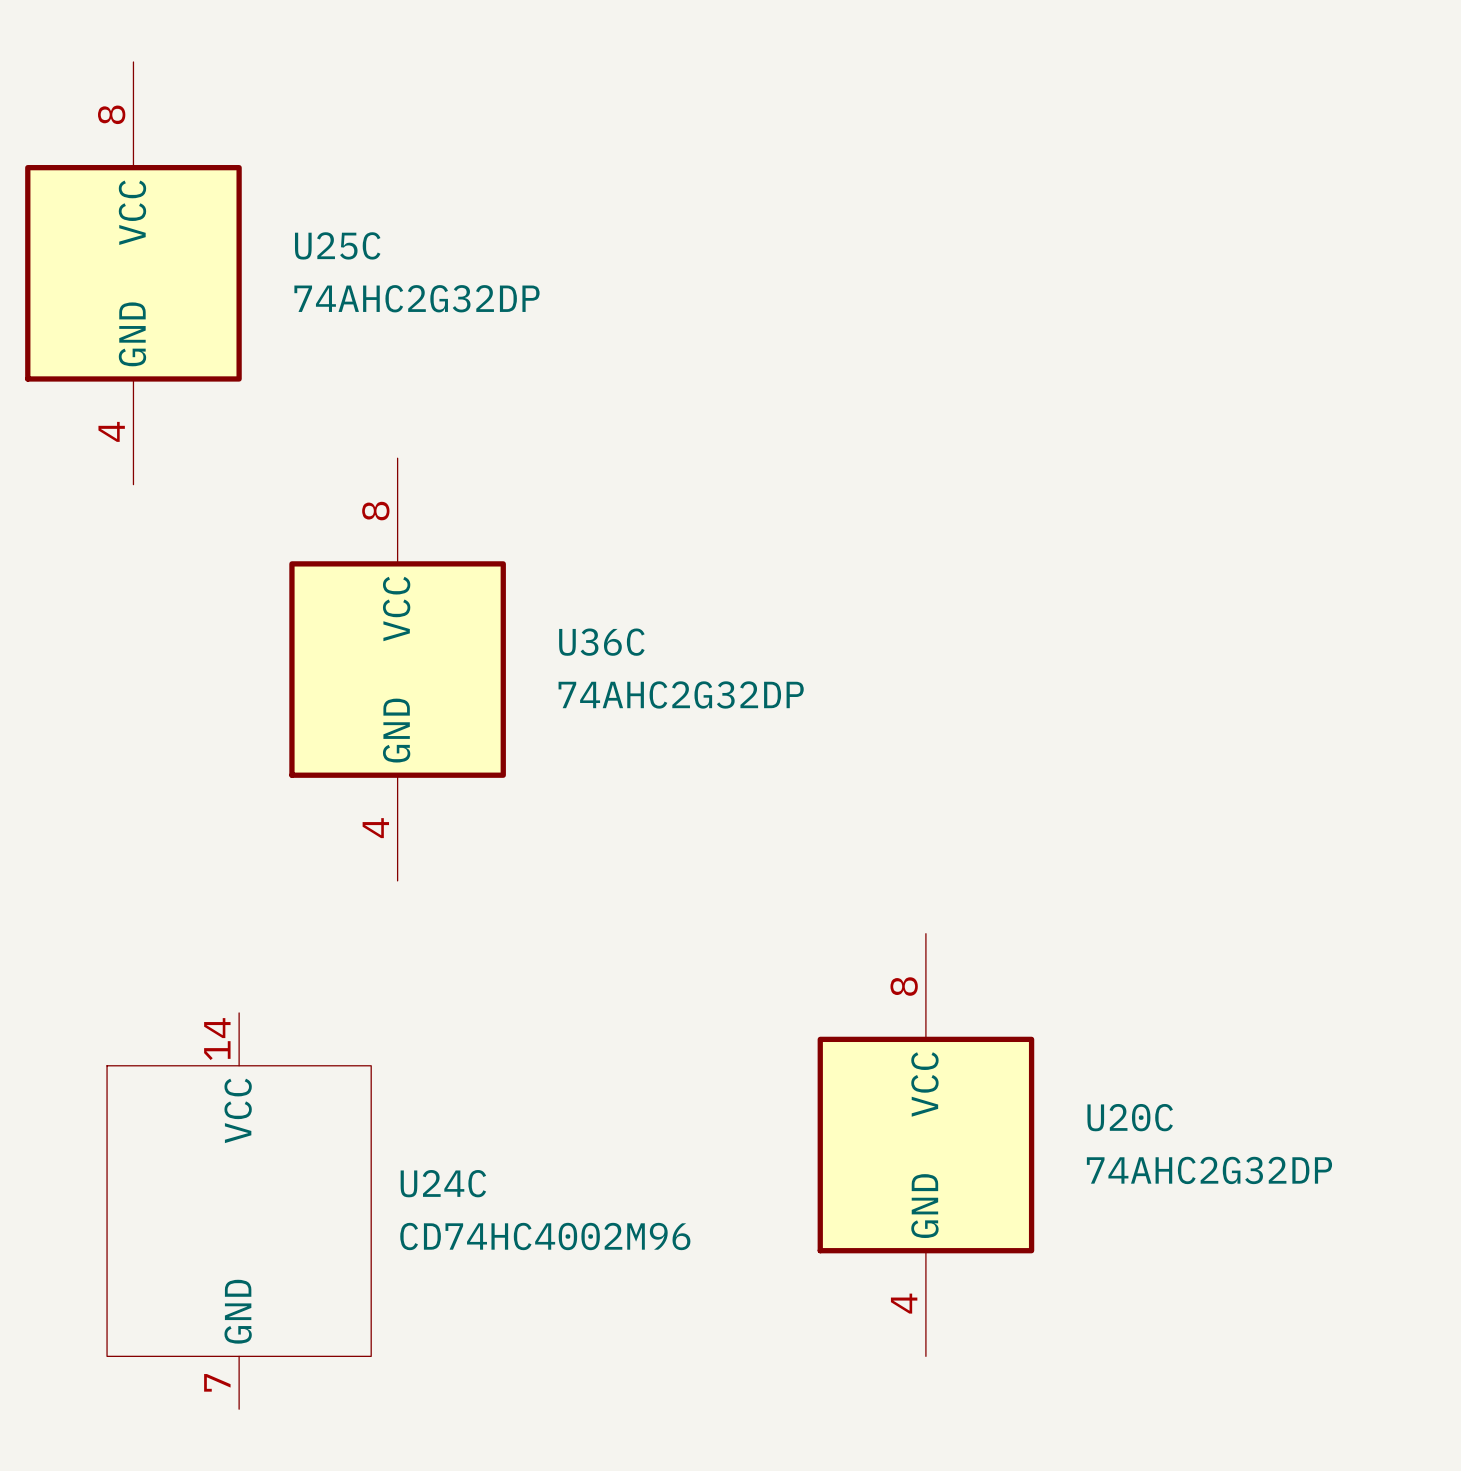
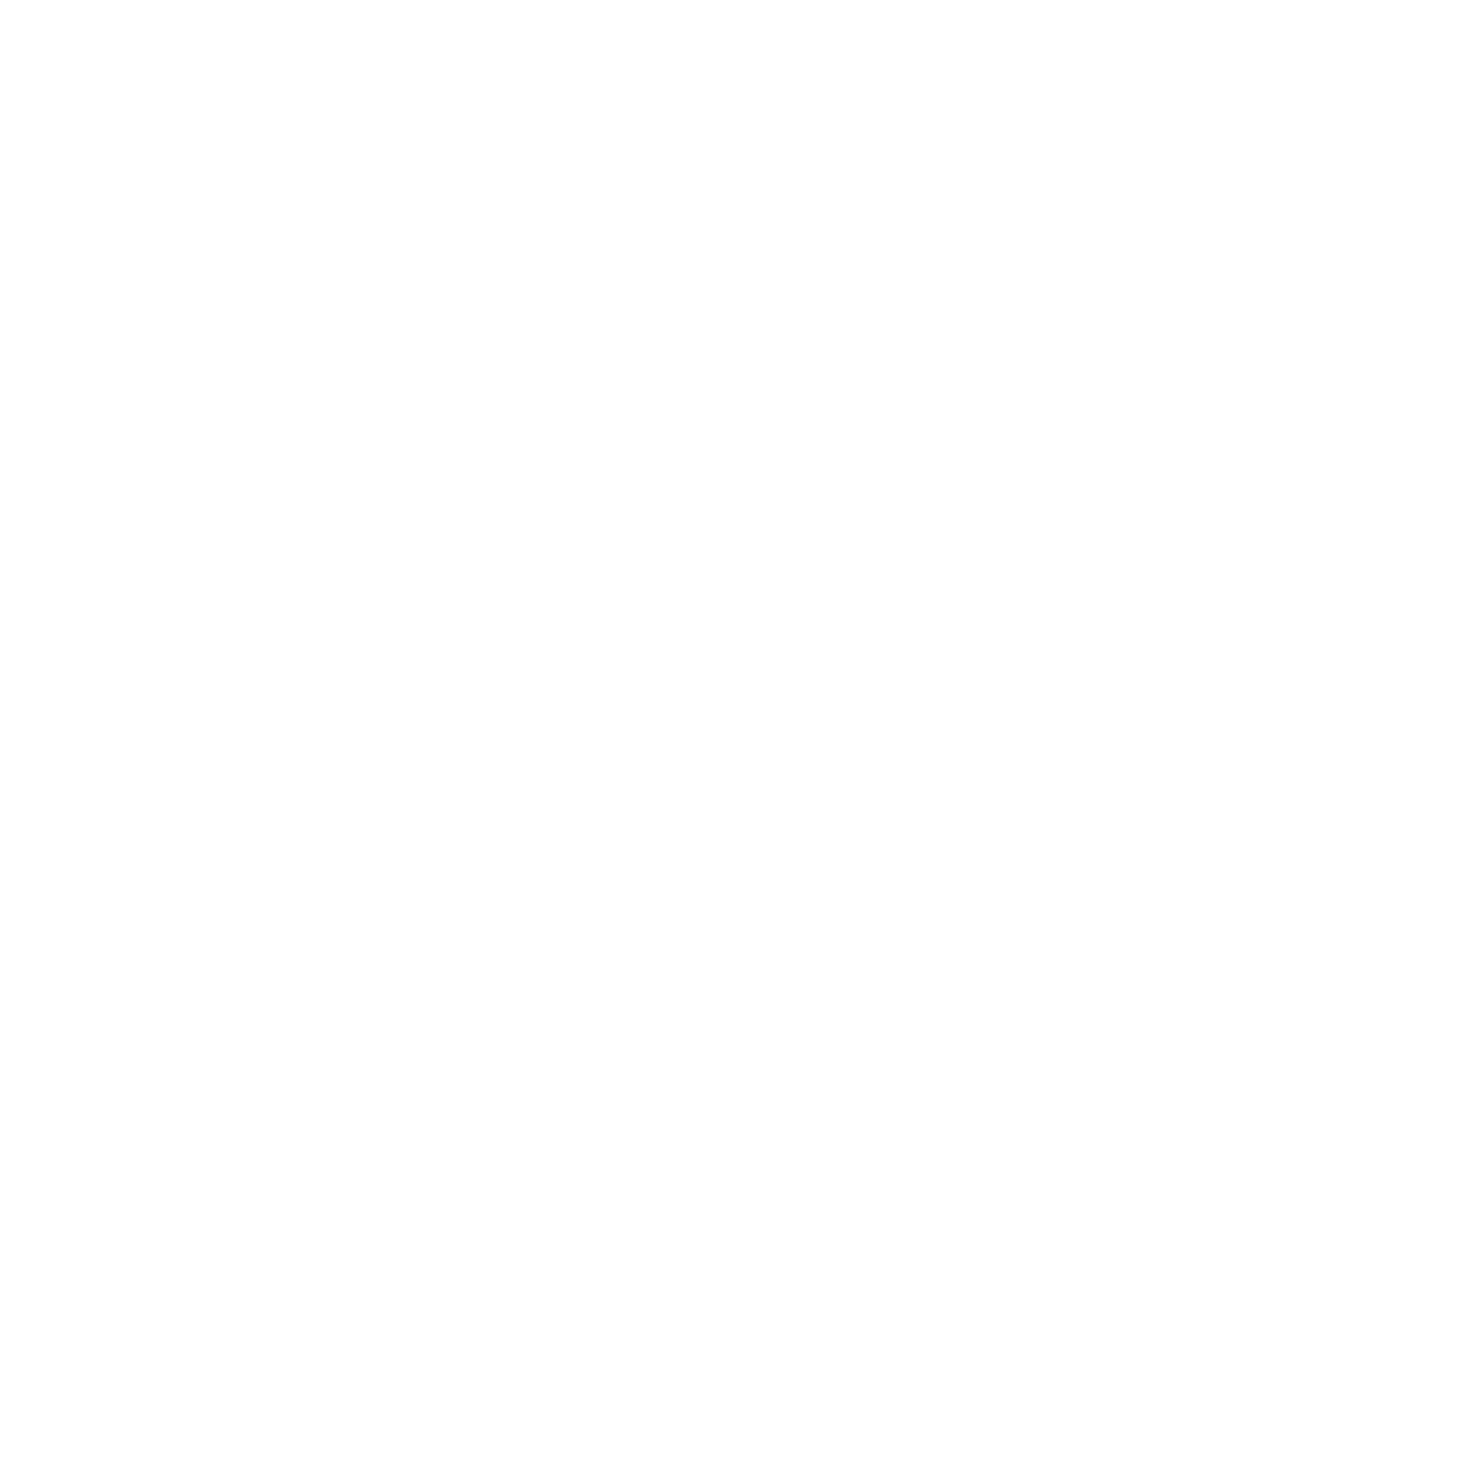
U25C: 74AHC2G32DP (133, 273) -> none
U36C: 74AHC2G32DP (397, 669) -> none
U20C: 74AHC2G32DP (925, 1145) -> none
U24C: CD74HC4002M96 (239, 1211) -> none

